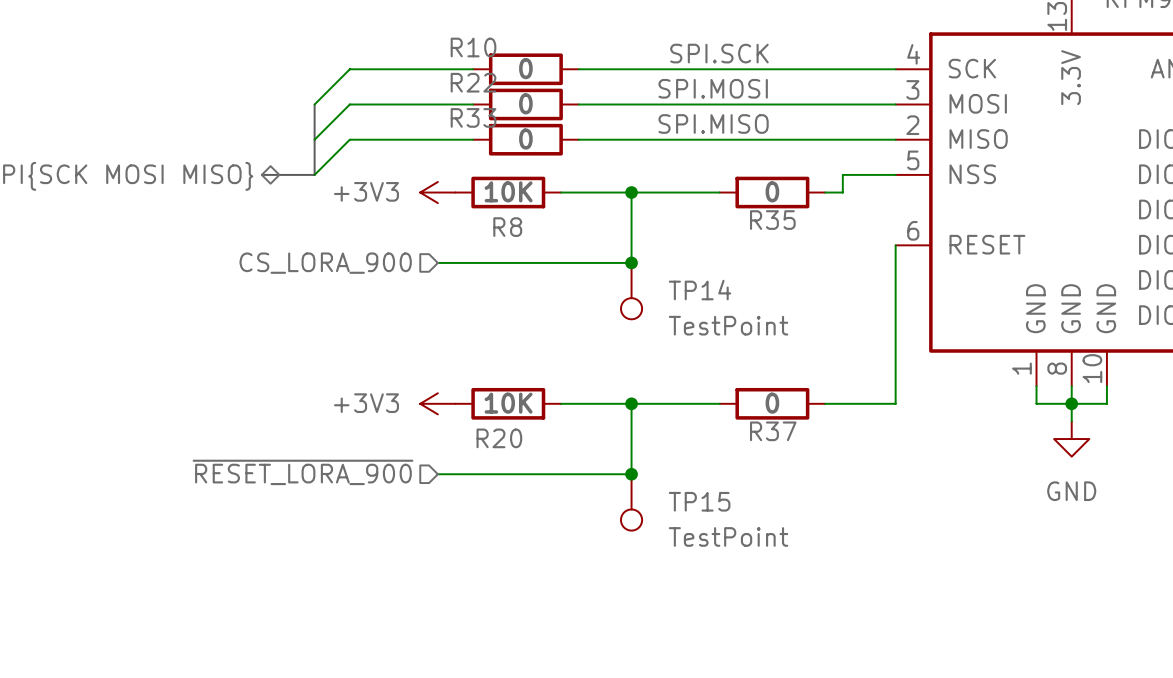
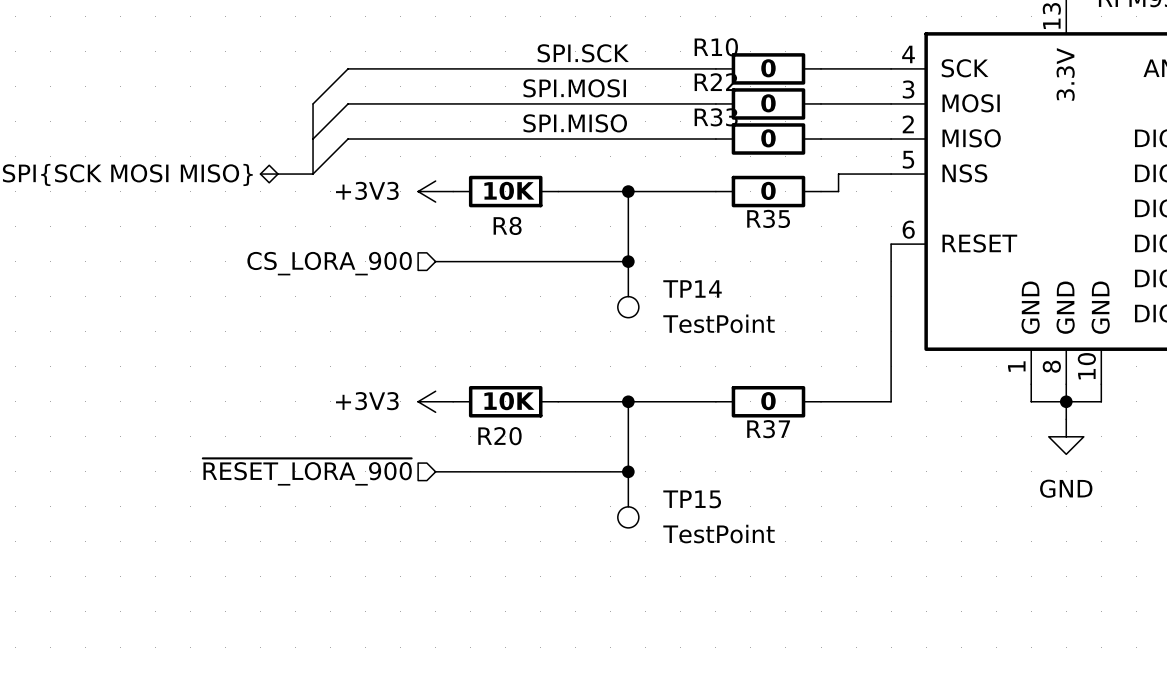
label position: SPI.SCK (719, 53) -> SPI.SCK (583, 53)
R10 position: (525, 69) -> (768, 68)
wire: (719, 69) (825, 69) -> (470, 68) (575, 68)
label position: SPI.MOSI (713, 88) -> SPI.MOSI (574, 88)
R22 position: (525, 104) -> (768, 103)
wire: (719, 104) (825, 104) -> (470, 103) (575, 103)
label position: SPI.MISO (713, 123) -> SPI.MISO (575, 123)
R33 position: (525, 139) -> (768, 139)
wire: (719, 139) (825, 139) -> (470, 139) (575, 139)

